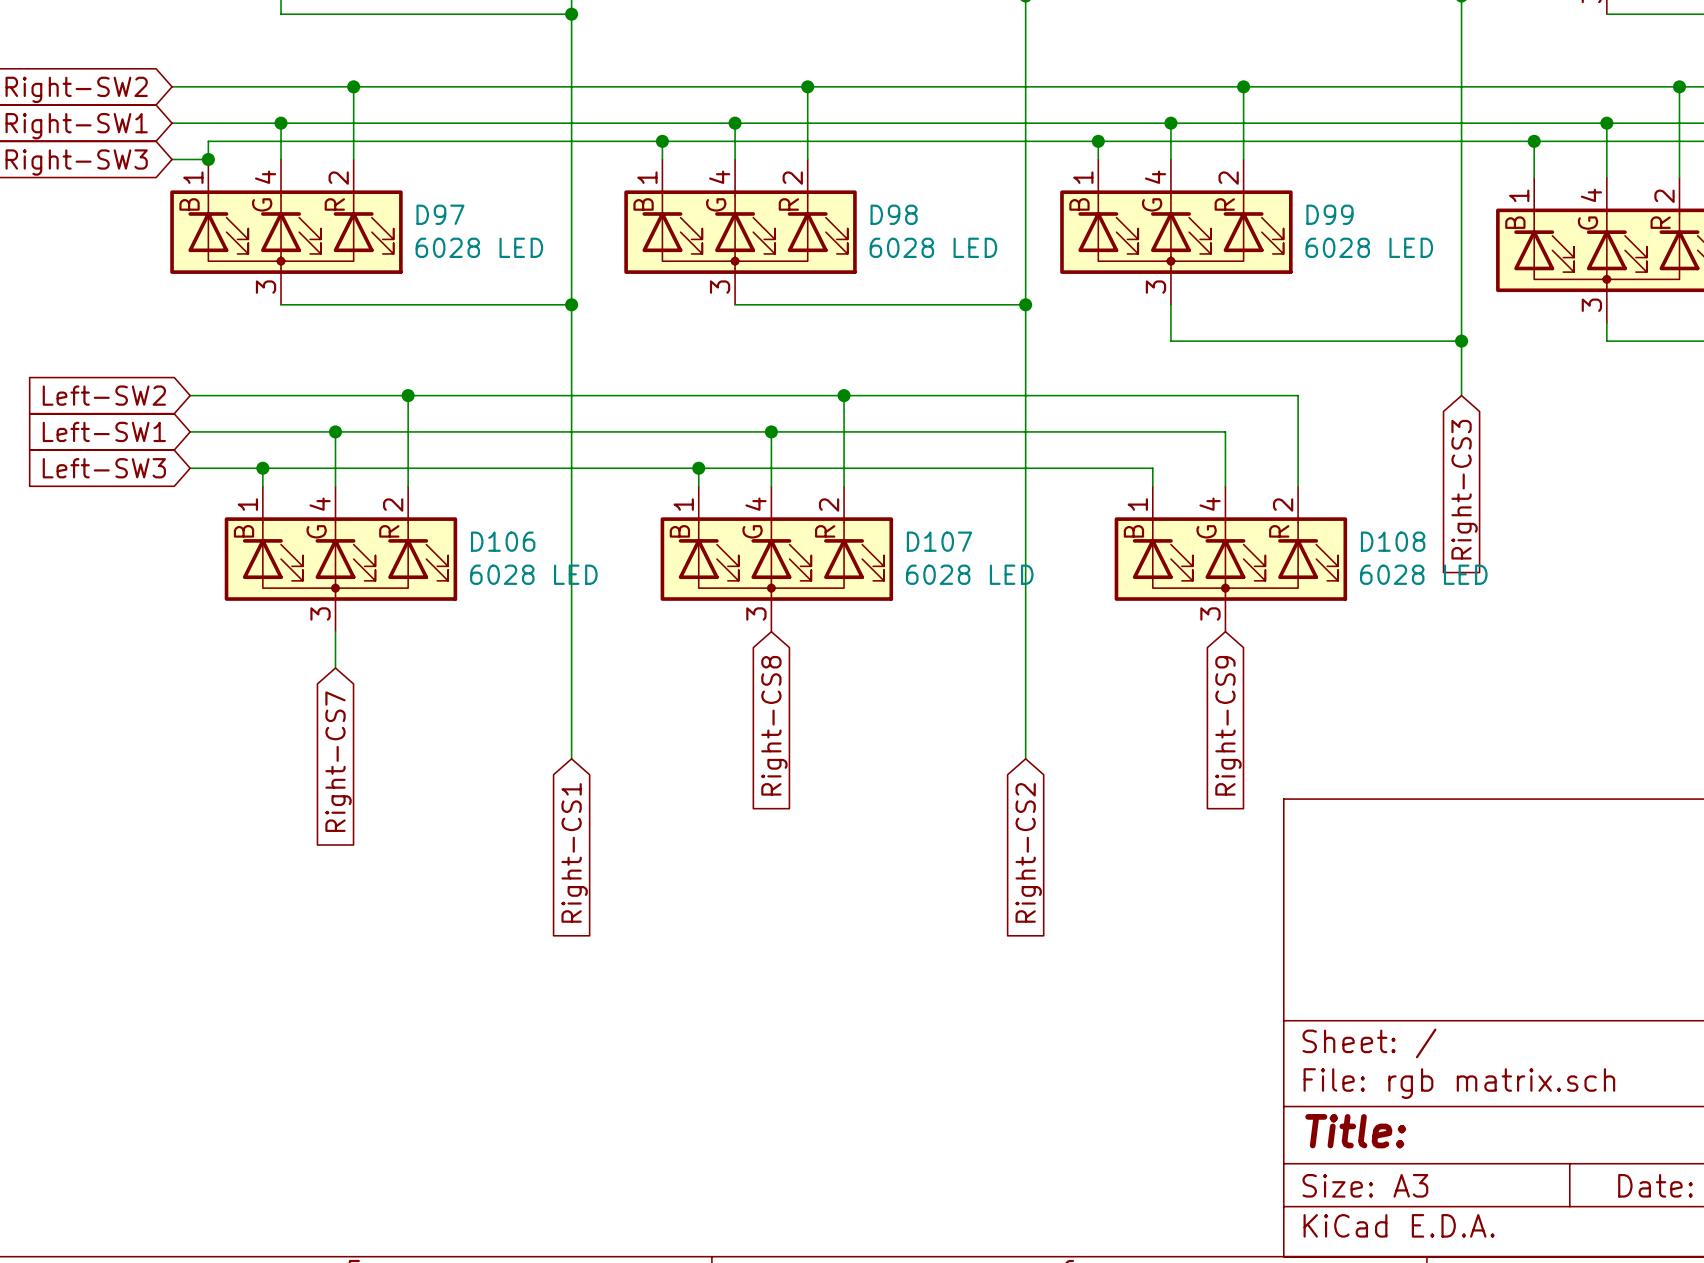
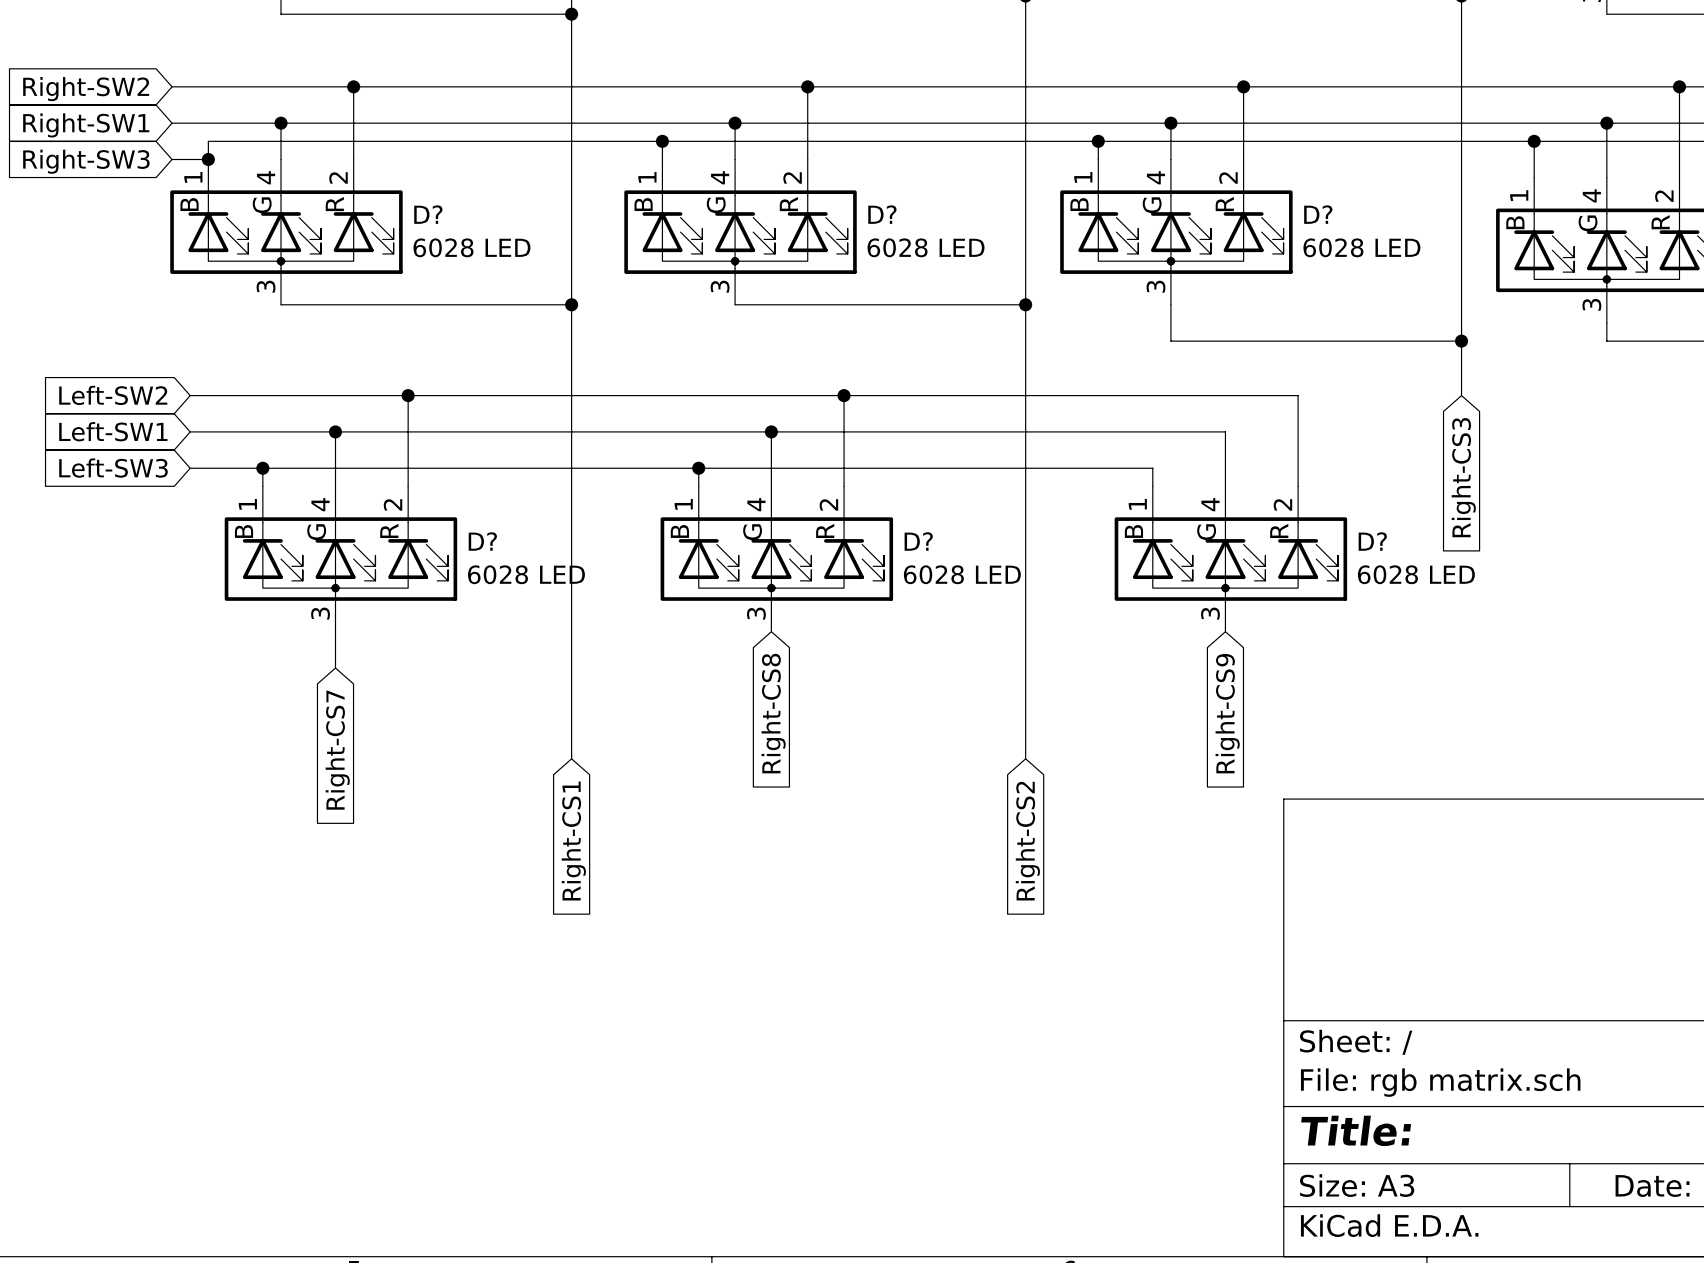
D97 name: D97 (440, 214) -> D? (428, 214)
D98 name: D98 (894, 214) -> D? (882, 214)
D99 name: D99 (1329, 214) -> D? (1318, 214)
D106 name: D106 (503, 541) -> D? (482, 541)
D107 name: D107 (939, 541) -> D? (918, 541)
D108 name: D108 (1393, 541) -> D? (1372, 541)

